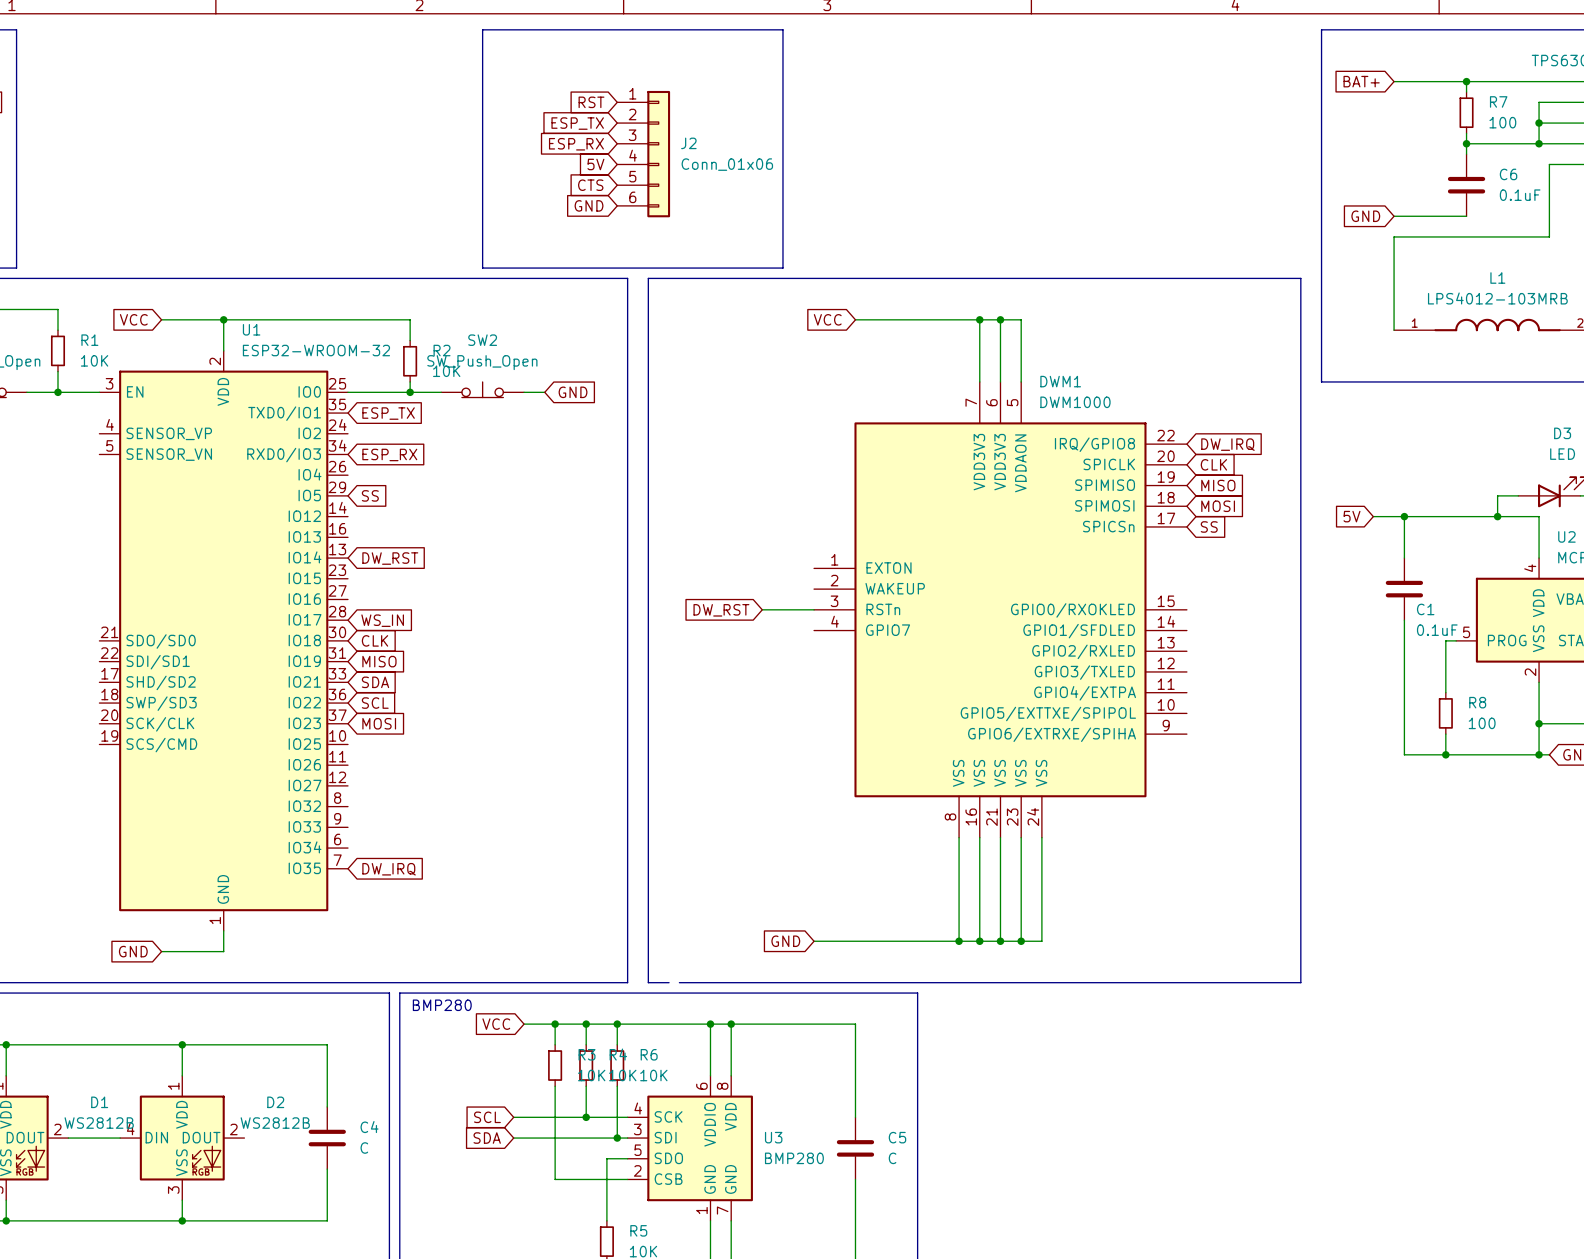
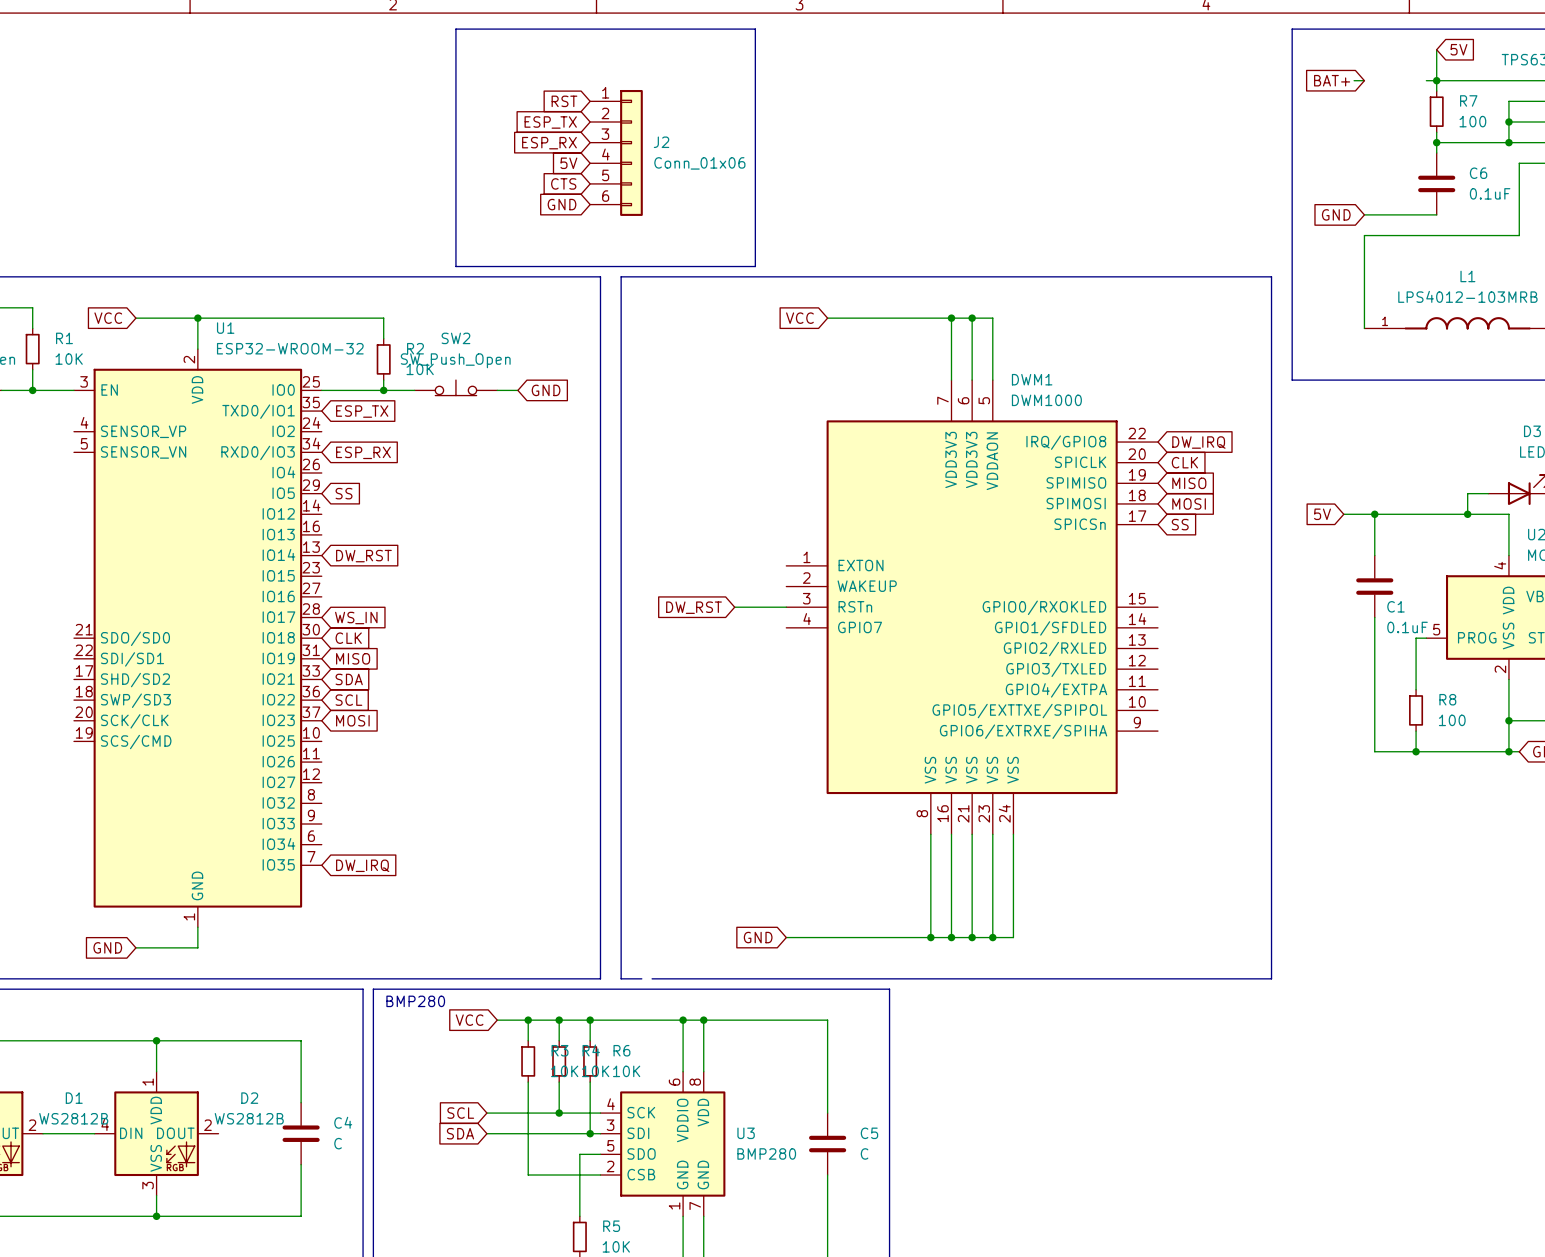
wire: none -> (1436, 49) (1436, 80)
global label: none -> 5V (1458, 49)
wire: (1394, 81) (1456, 81) -> (1364, 80) (1354, 80)

